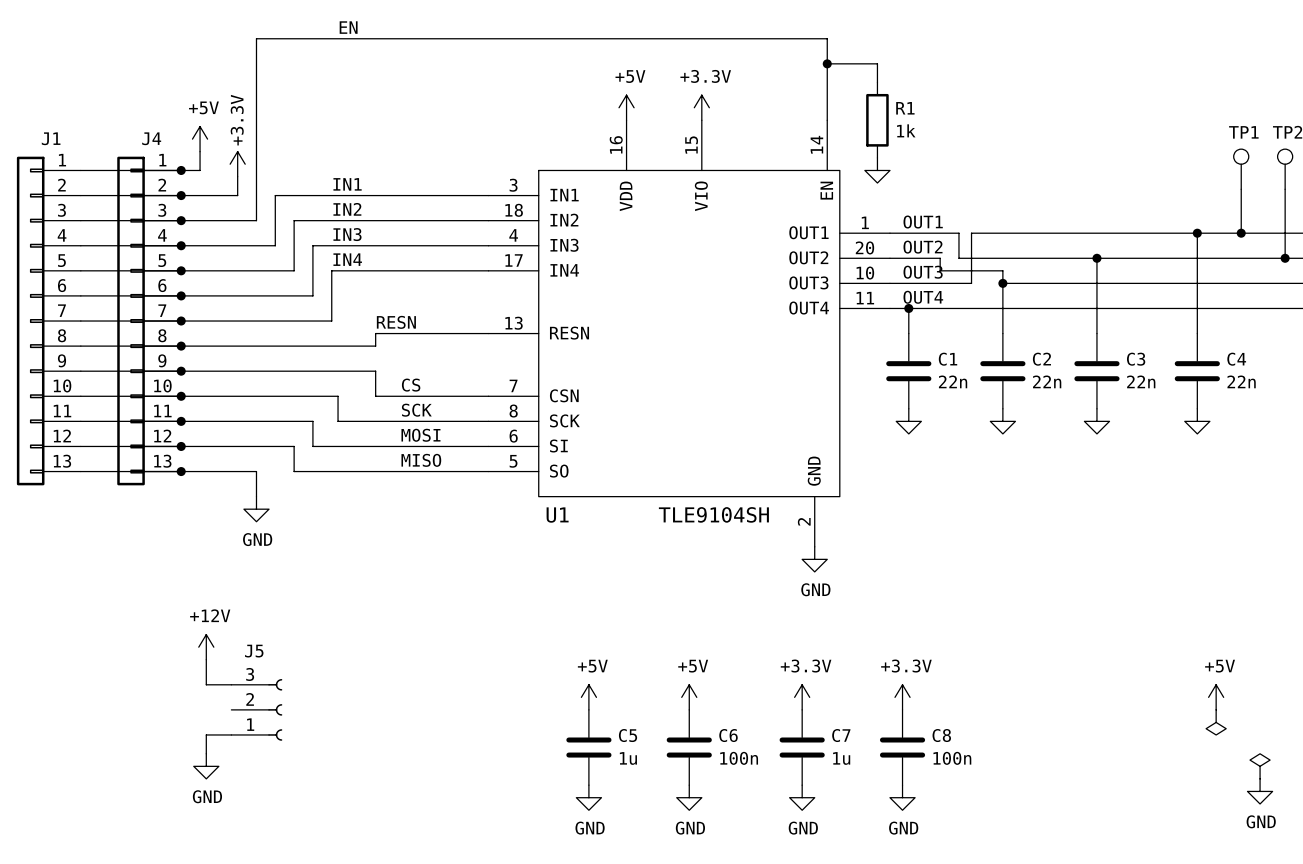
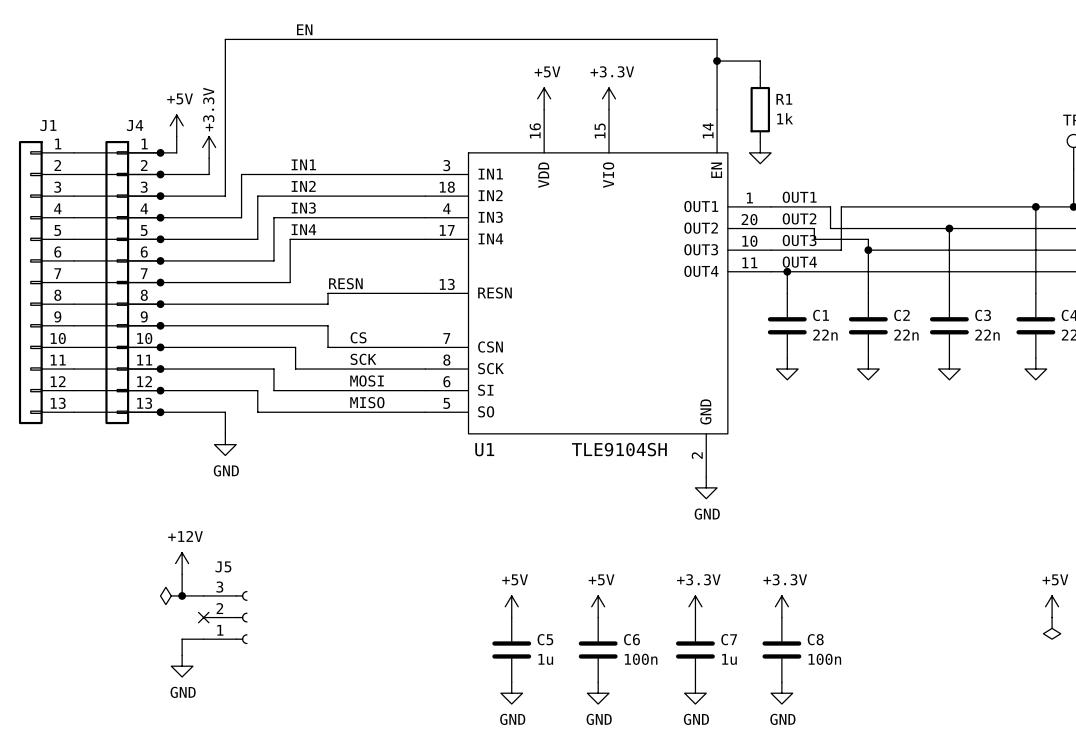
power symbol: none -> (171, 595)
junction: none -> (182, 595)
no-connect mark: none -> (203, 617)

